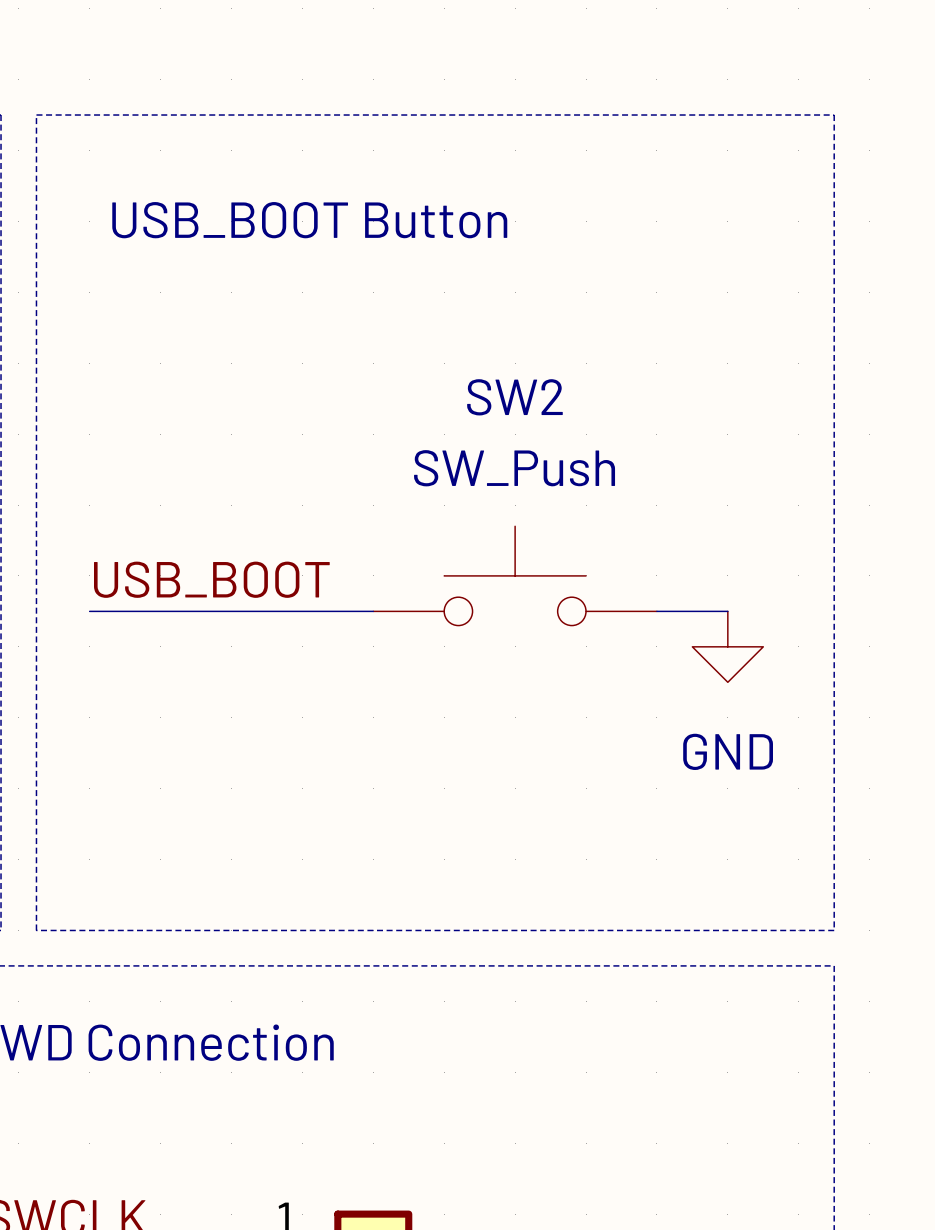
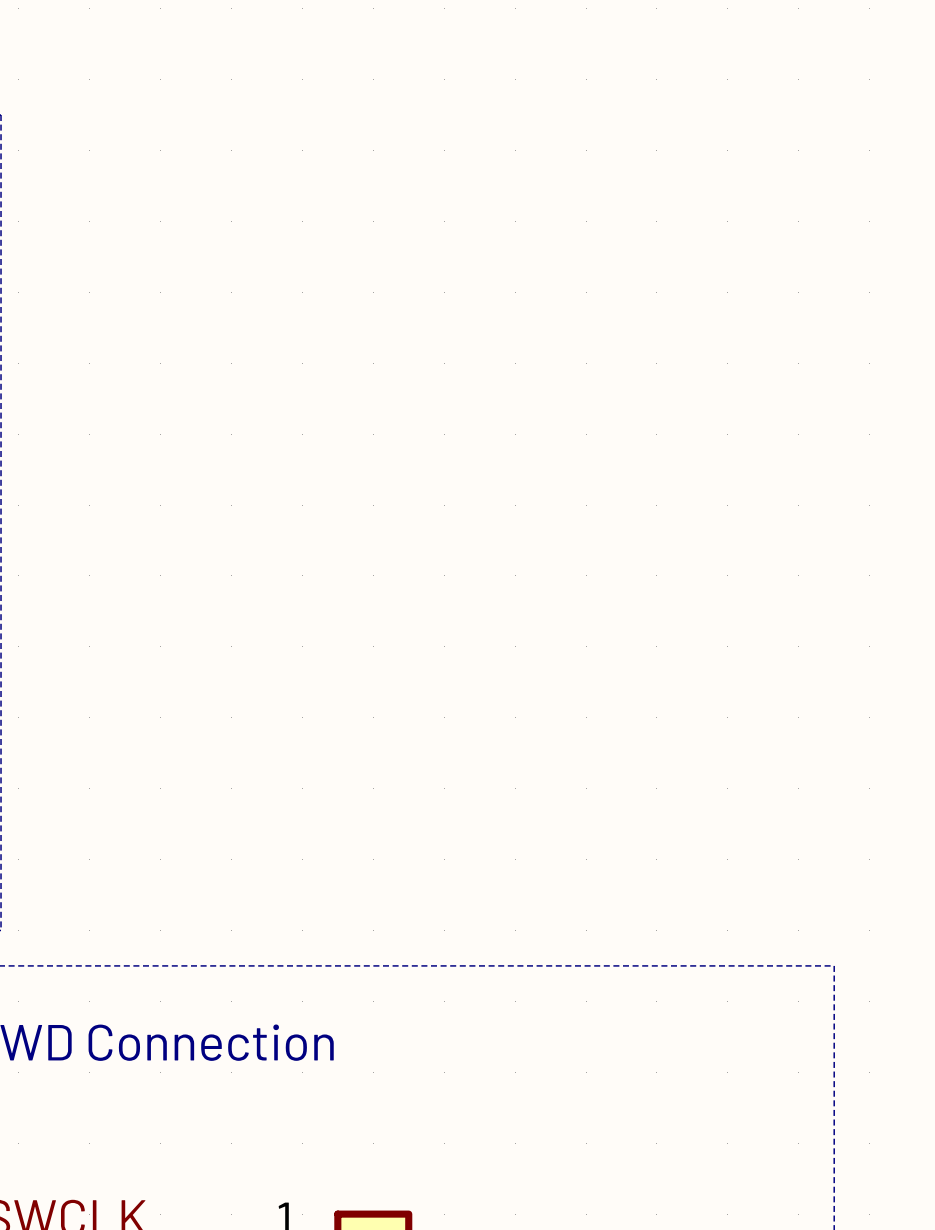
line: (36, 115) (834, 115) (834, 930) (36, 930) (36, 115) -> none
text: USB_BOOT Button (309, 220) -> none
SW2: SW_Push (515, 575) -> none
label: USB_BOOT (211, 579) -> none
wire: (89, 611) (373, 611) -> none
wire: (656, 611) (727, 611) -> none
power symbol: GND (727, 646) -> none

